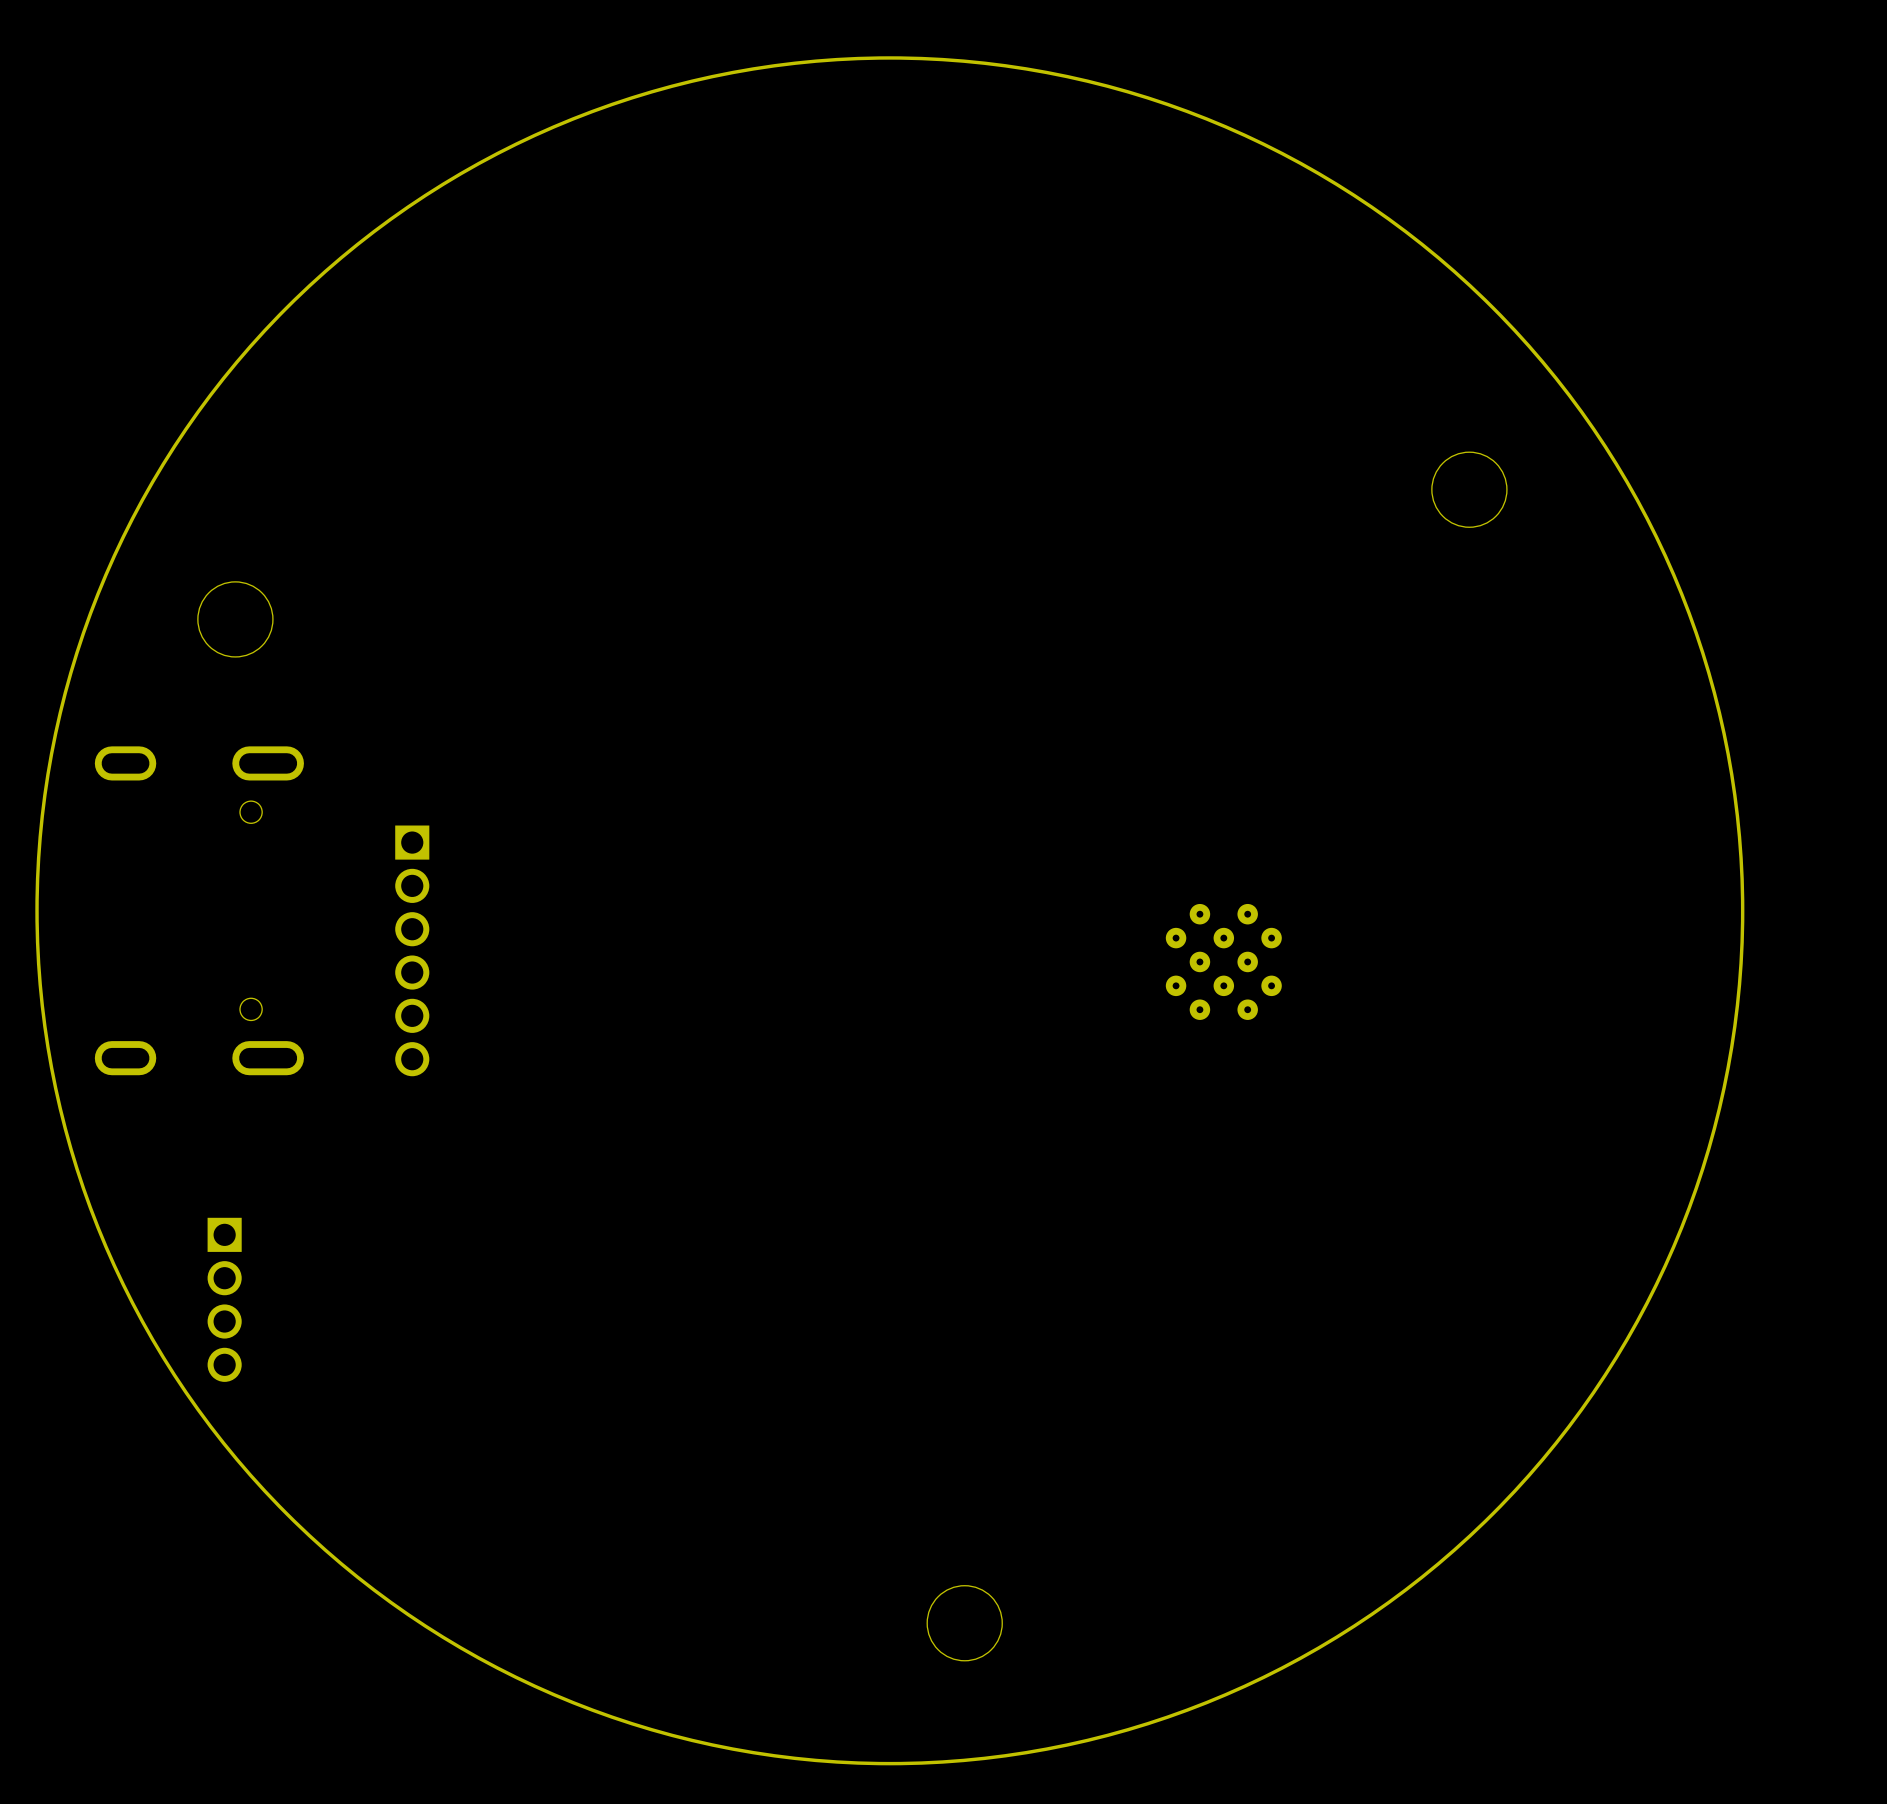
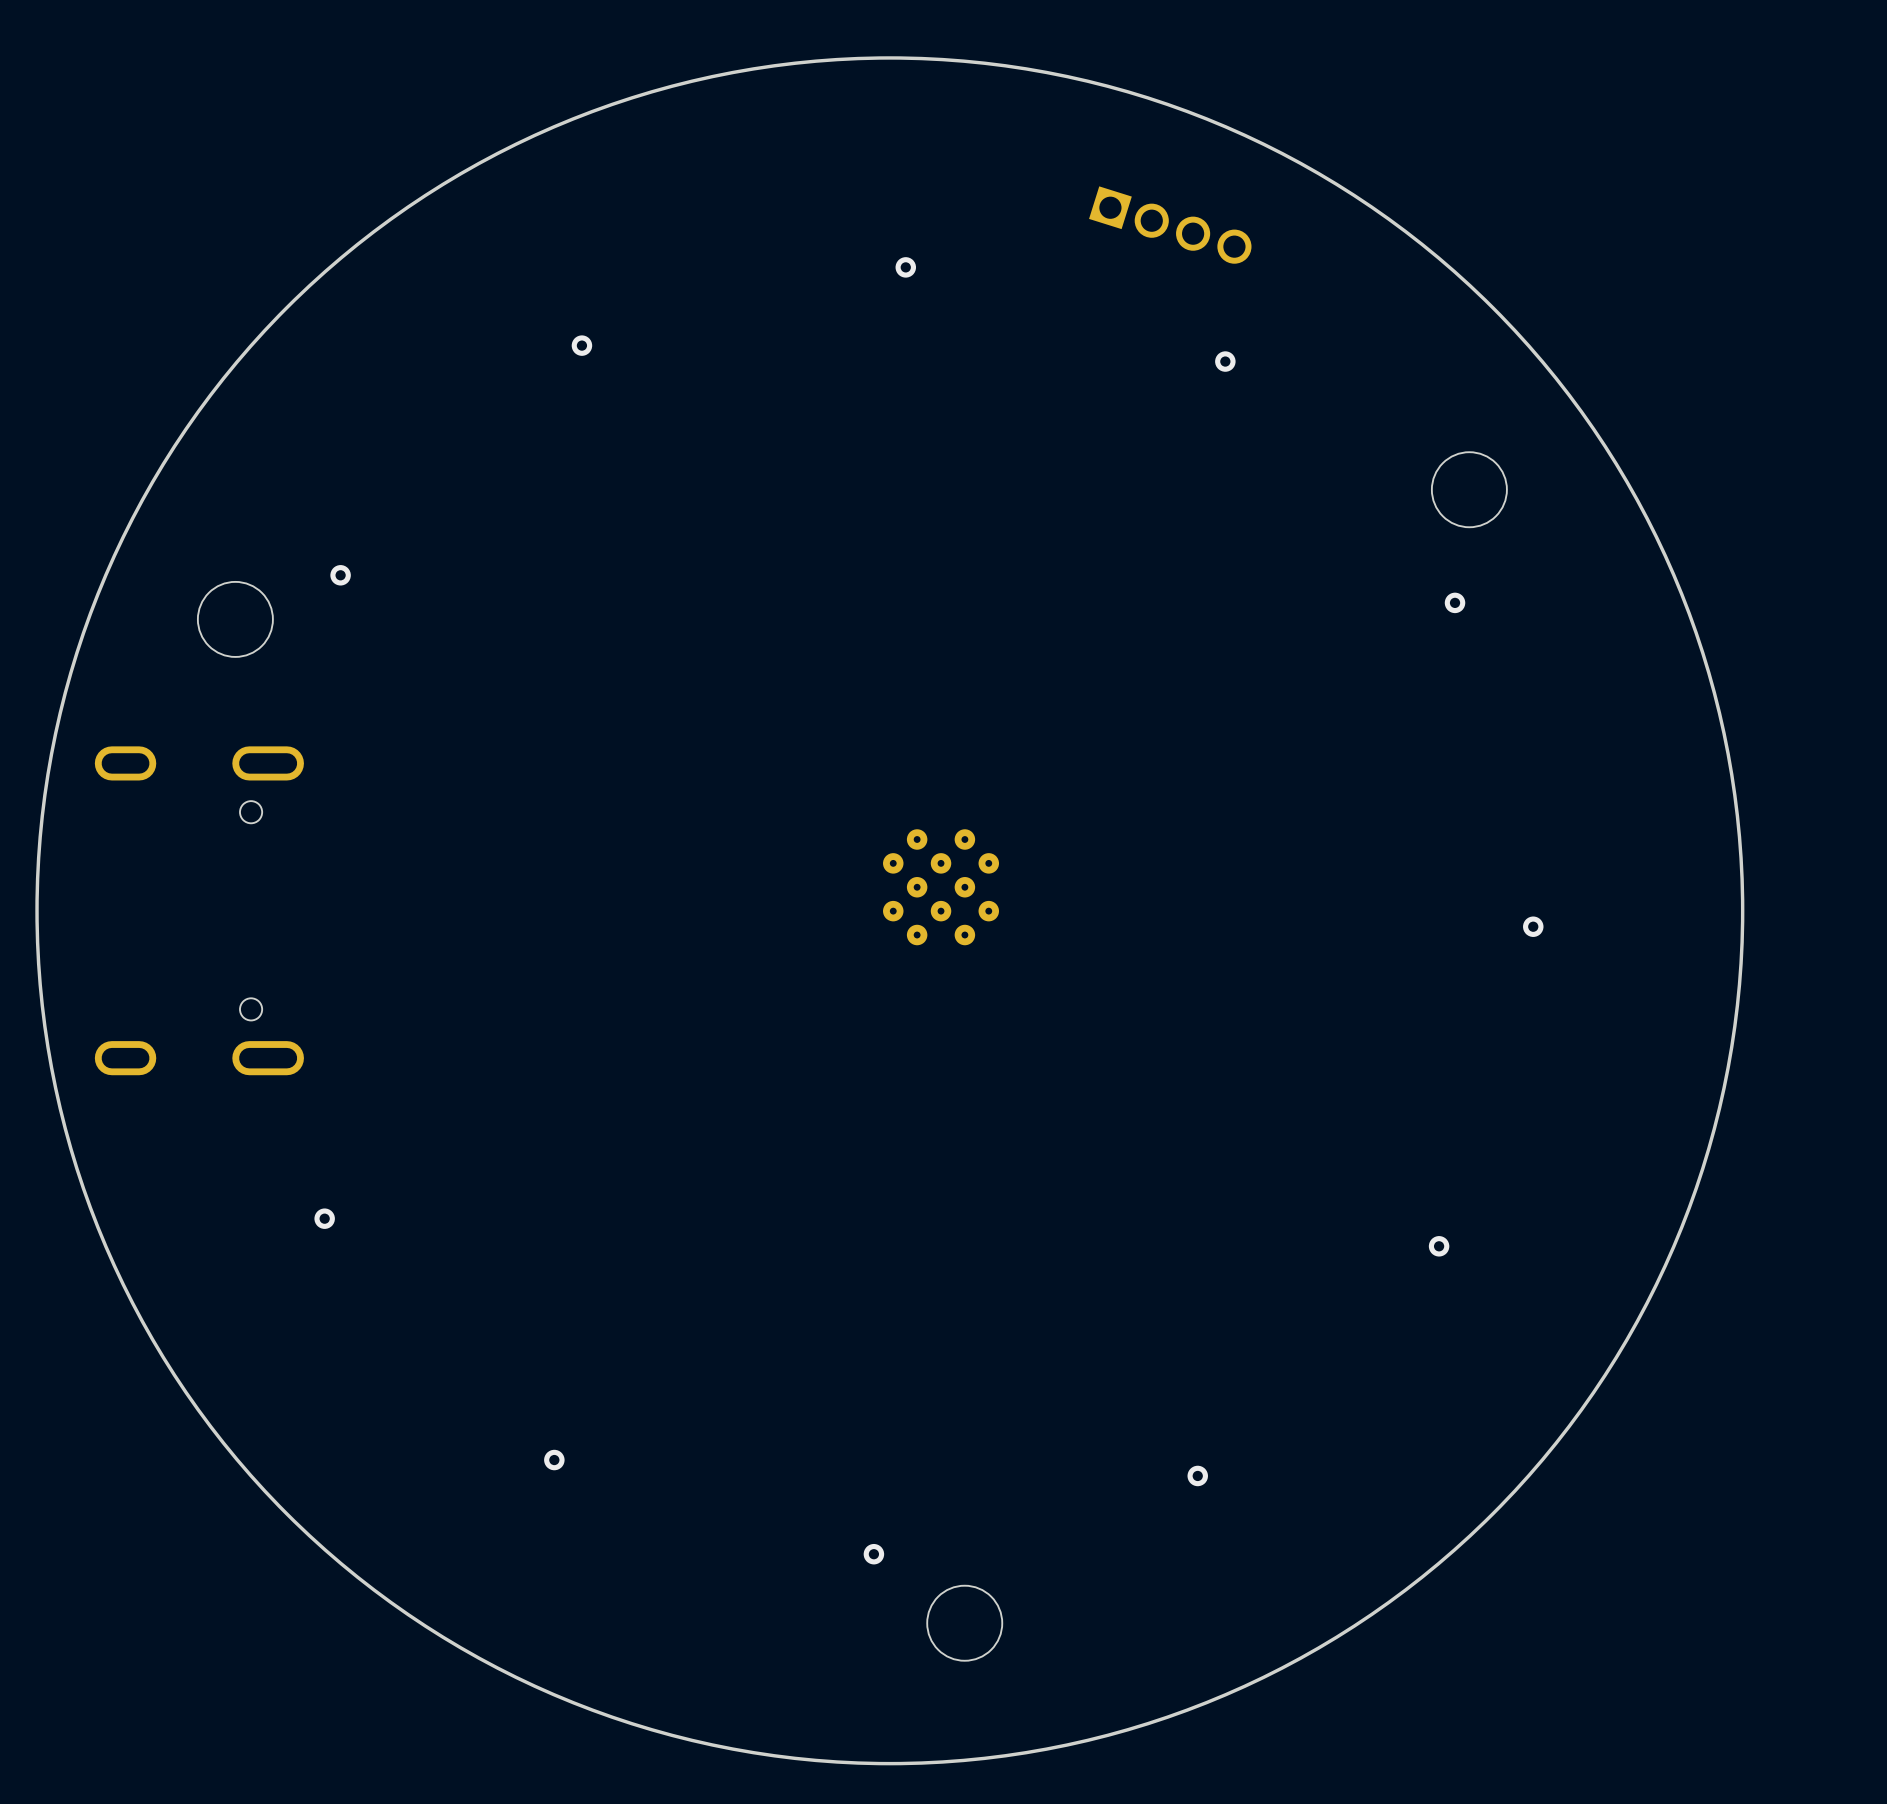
part: none -> (1170, 225)
via: none -> (905, 267)
via: none -> (581, 345)
via: none -> (1225, 361)
via: none -> (340, 575)
via: none -> (1455, 602)
via: none -> (1533, 926)
part: (412, 950) -> none
part position: (1223, 961) -> (941, 887)
via: none -> (324, 1218)
via: none -> (1439, 1246)
part: (224, 1299) -> none
via: none -> (554, 1460)
via: none -> (1197, 1475)
via: none -> (873, 1554)

